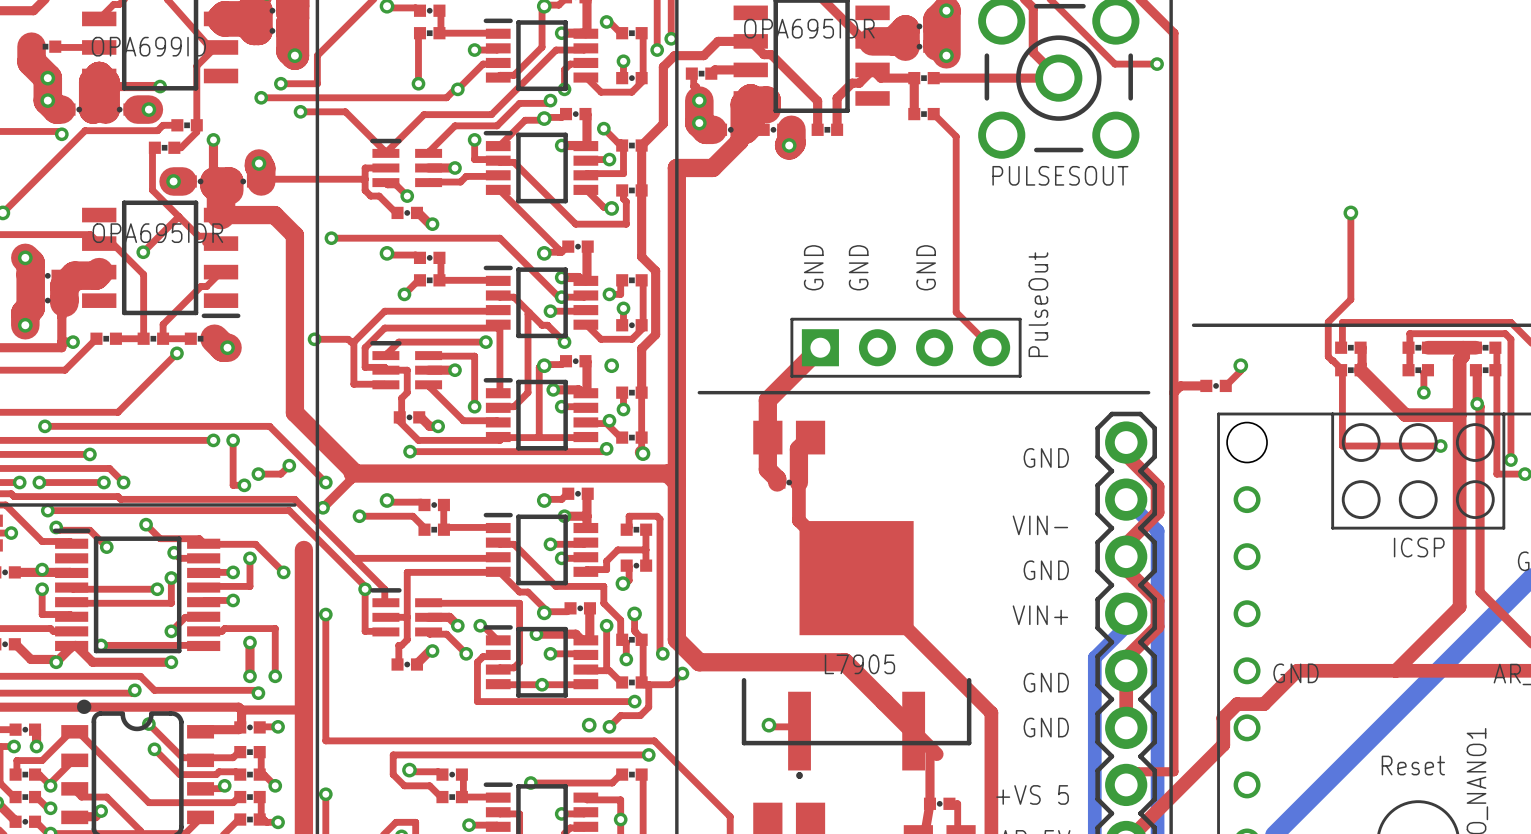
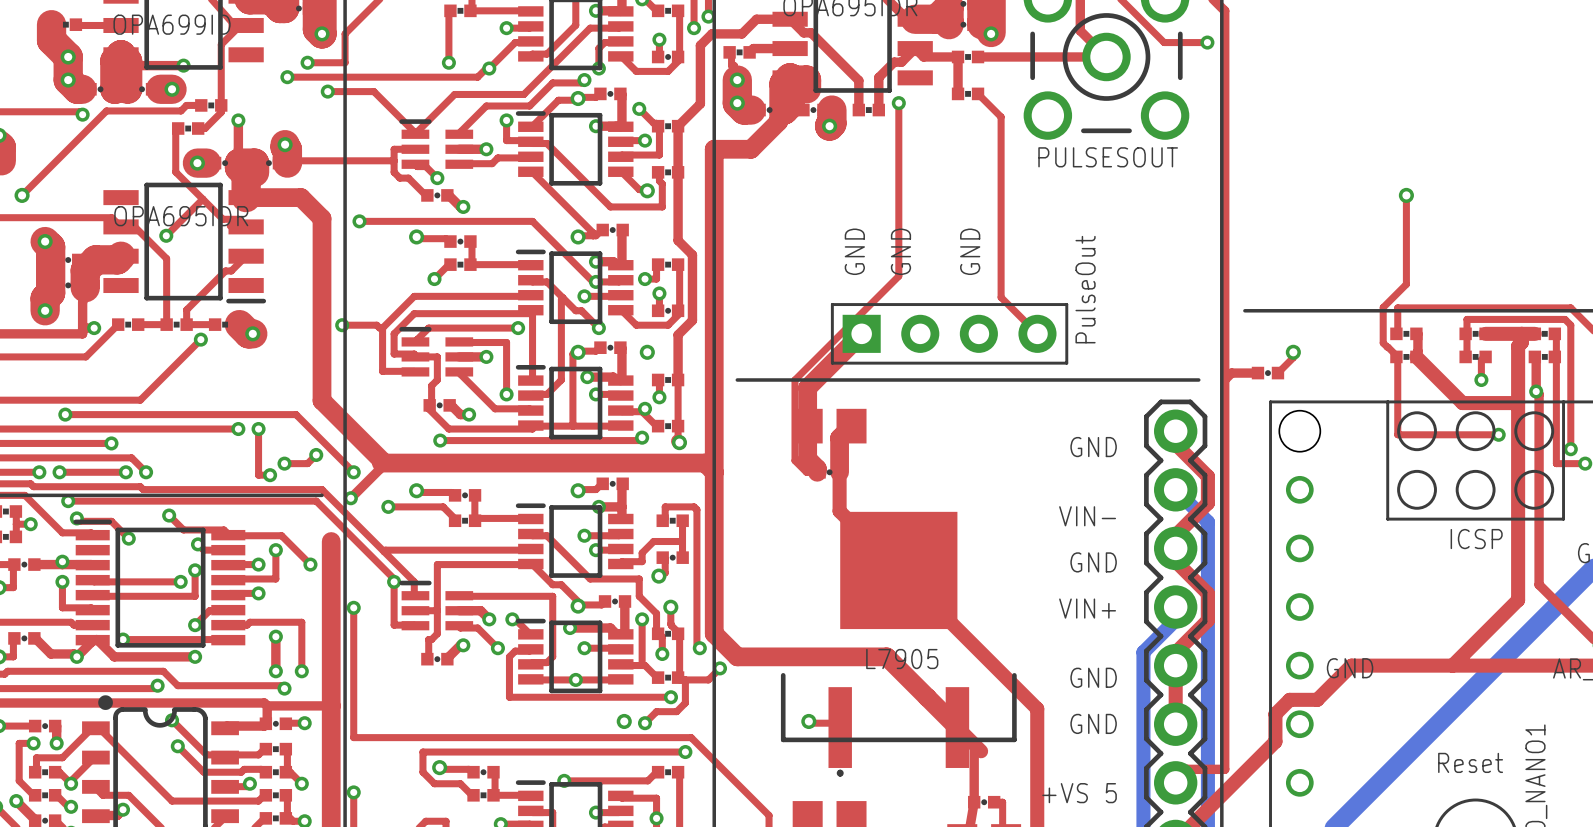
top track: none -> (898, 103) (898, 276) (794, 379) (794, 460) (806, 472) (819, 472)
via: none -> (898, 103)

